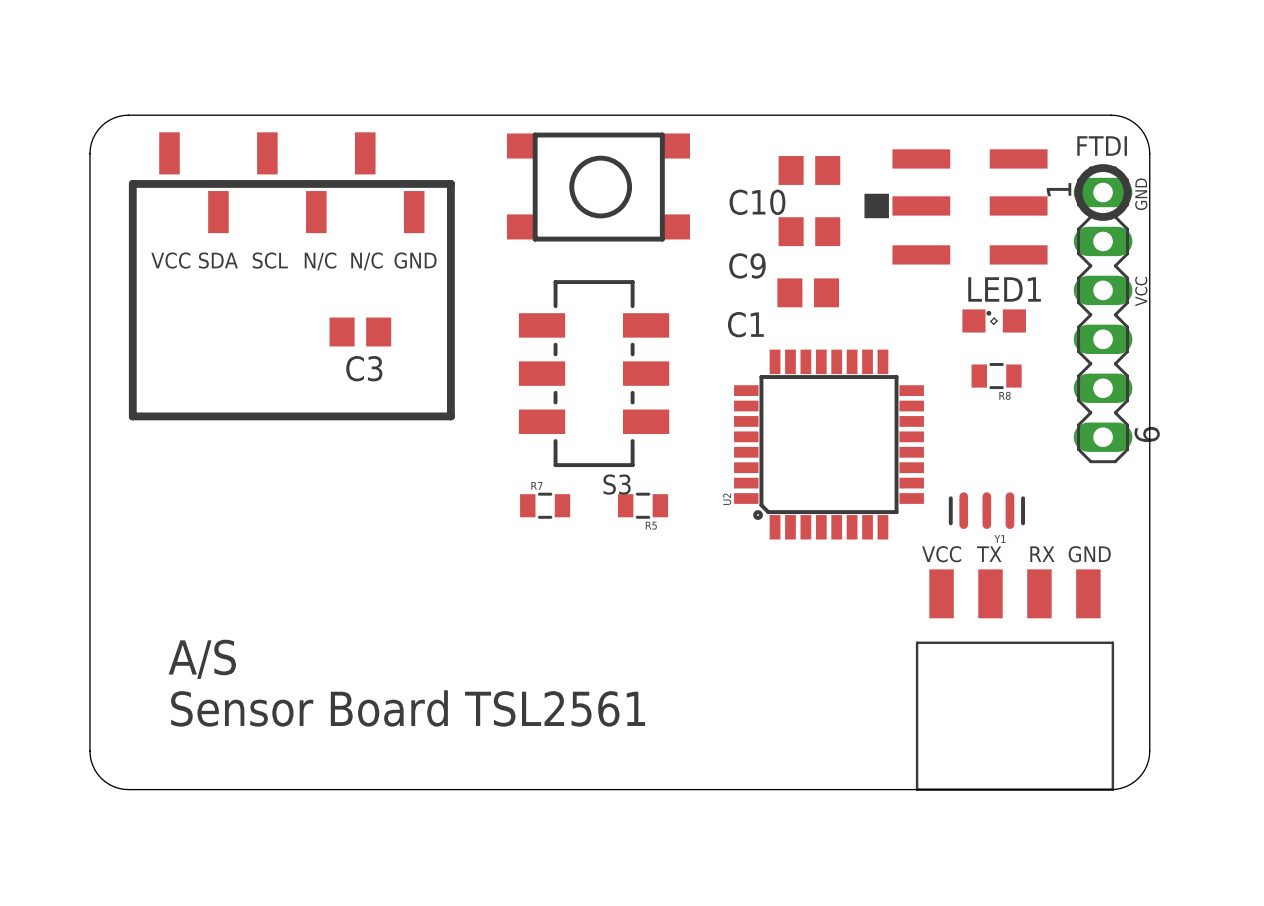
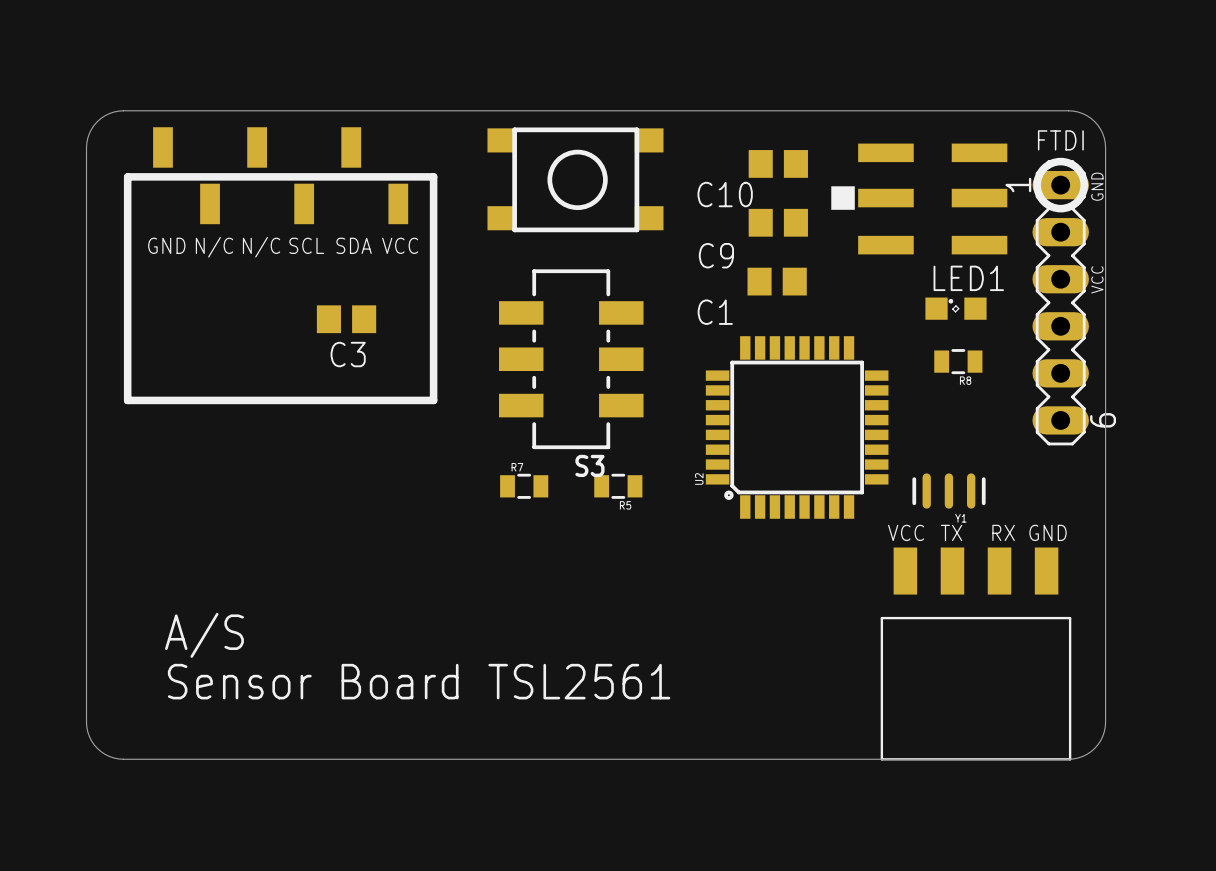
text: VCC (170, 260) -> GND (166, 245)
text: SDA (218, 260) -> N/C (214, 247)
text: SCL (270, 260) -> N/C (261, 247)
text: GND (415, 260) -> VCC (400, 245)
text: N/C (320, 261) -> SCL (306, 245)
text: N/C (367, 261) -> SDA (354, 245)

